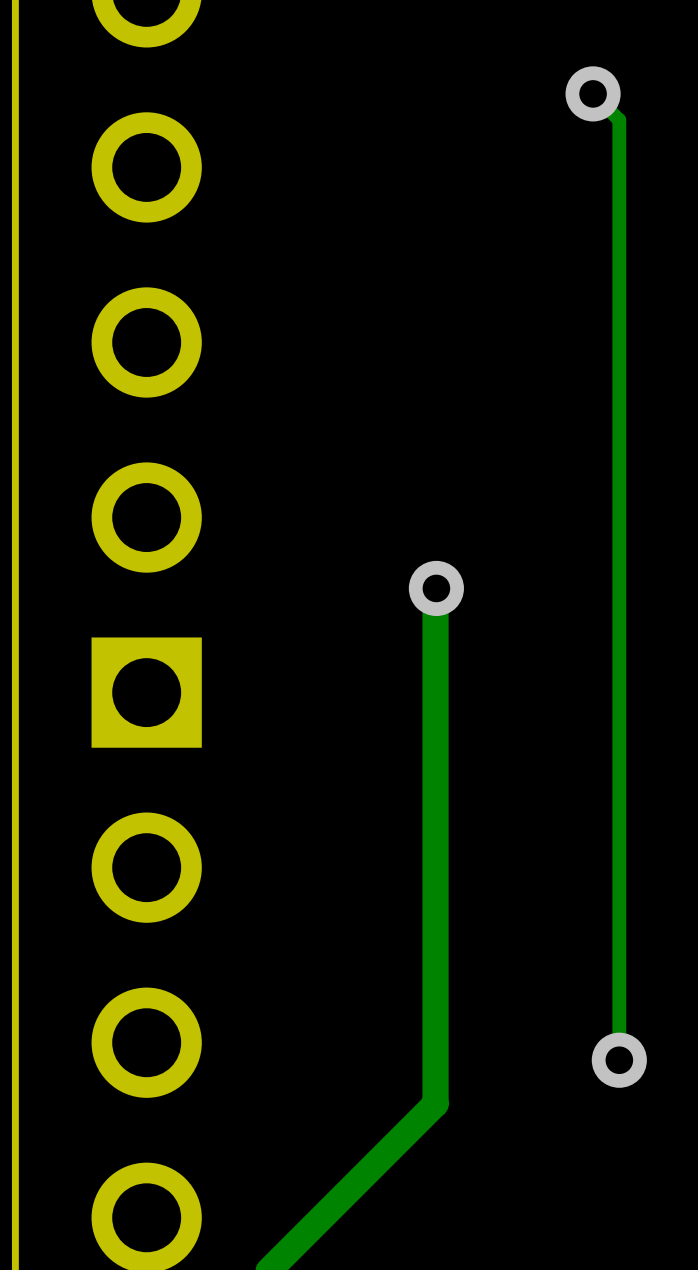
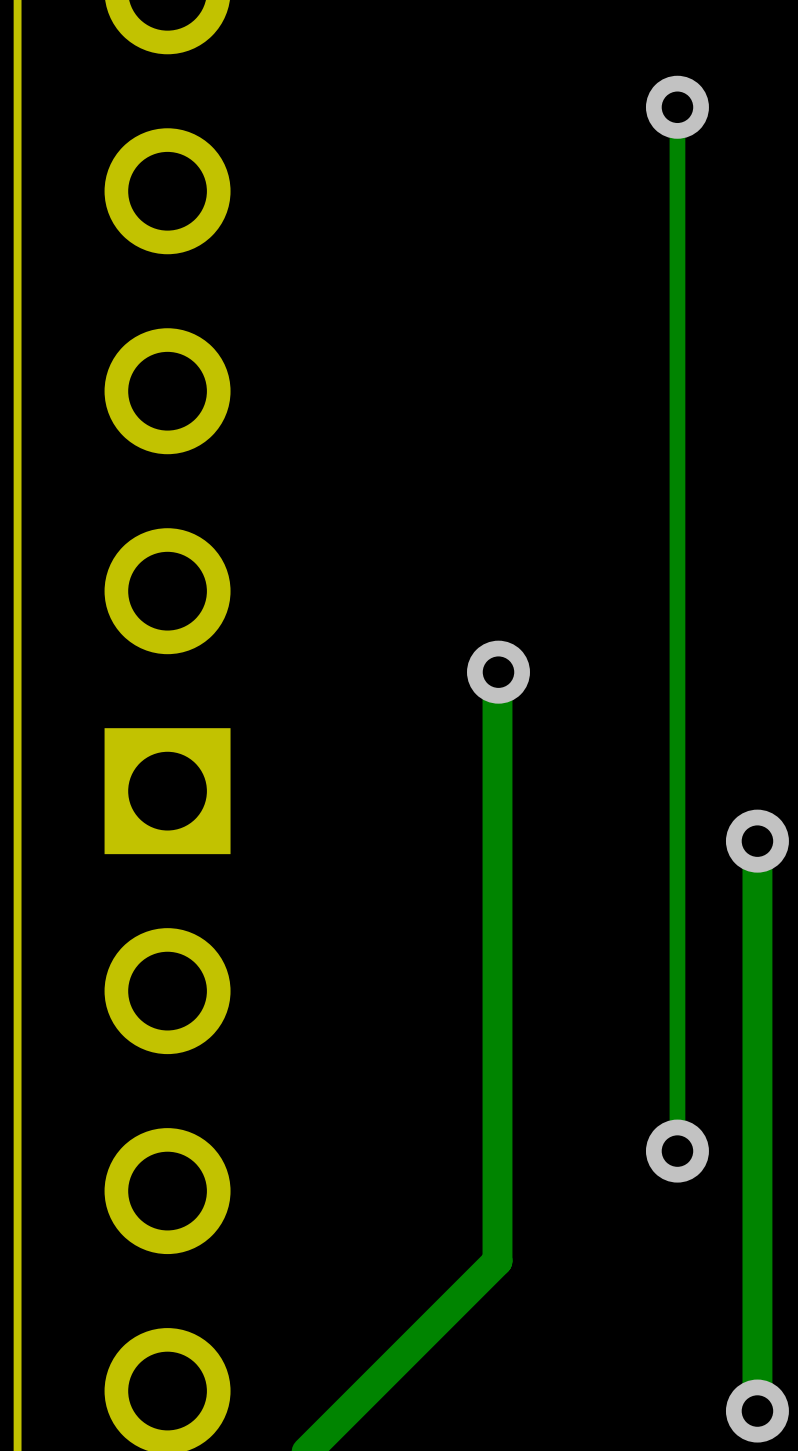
track: (593, 93) (619, 120) (619, 1060) -> (677, 107) (677, 1151)
track: none -> (757, 841) (757, 1411)
via: none -> (757, 841)
via position: (619, 1060) -> (677, 1151)
via: none -> (757, 1411)

